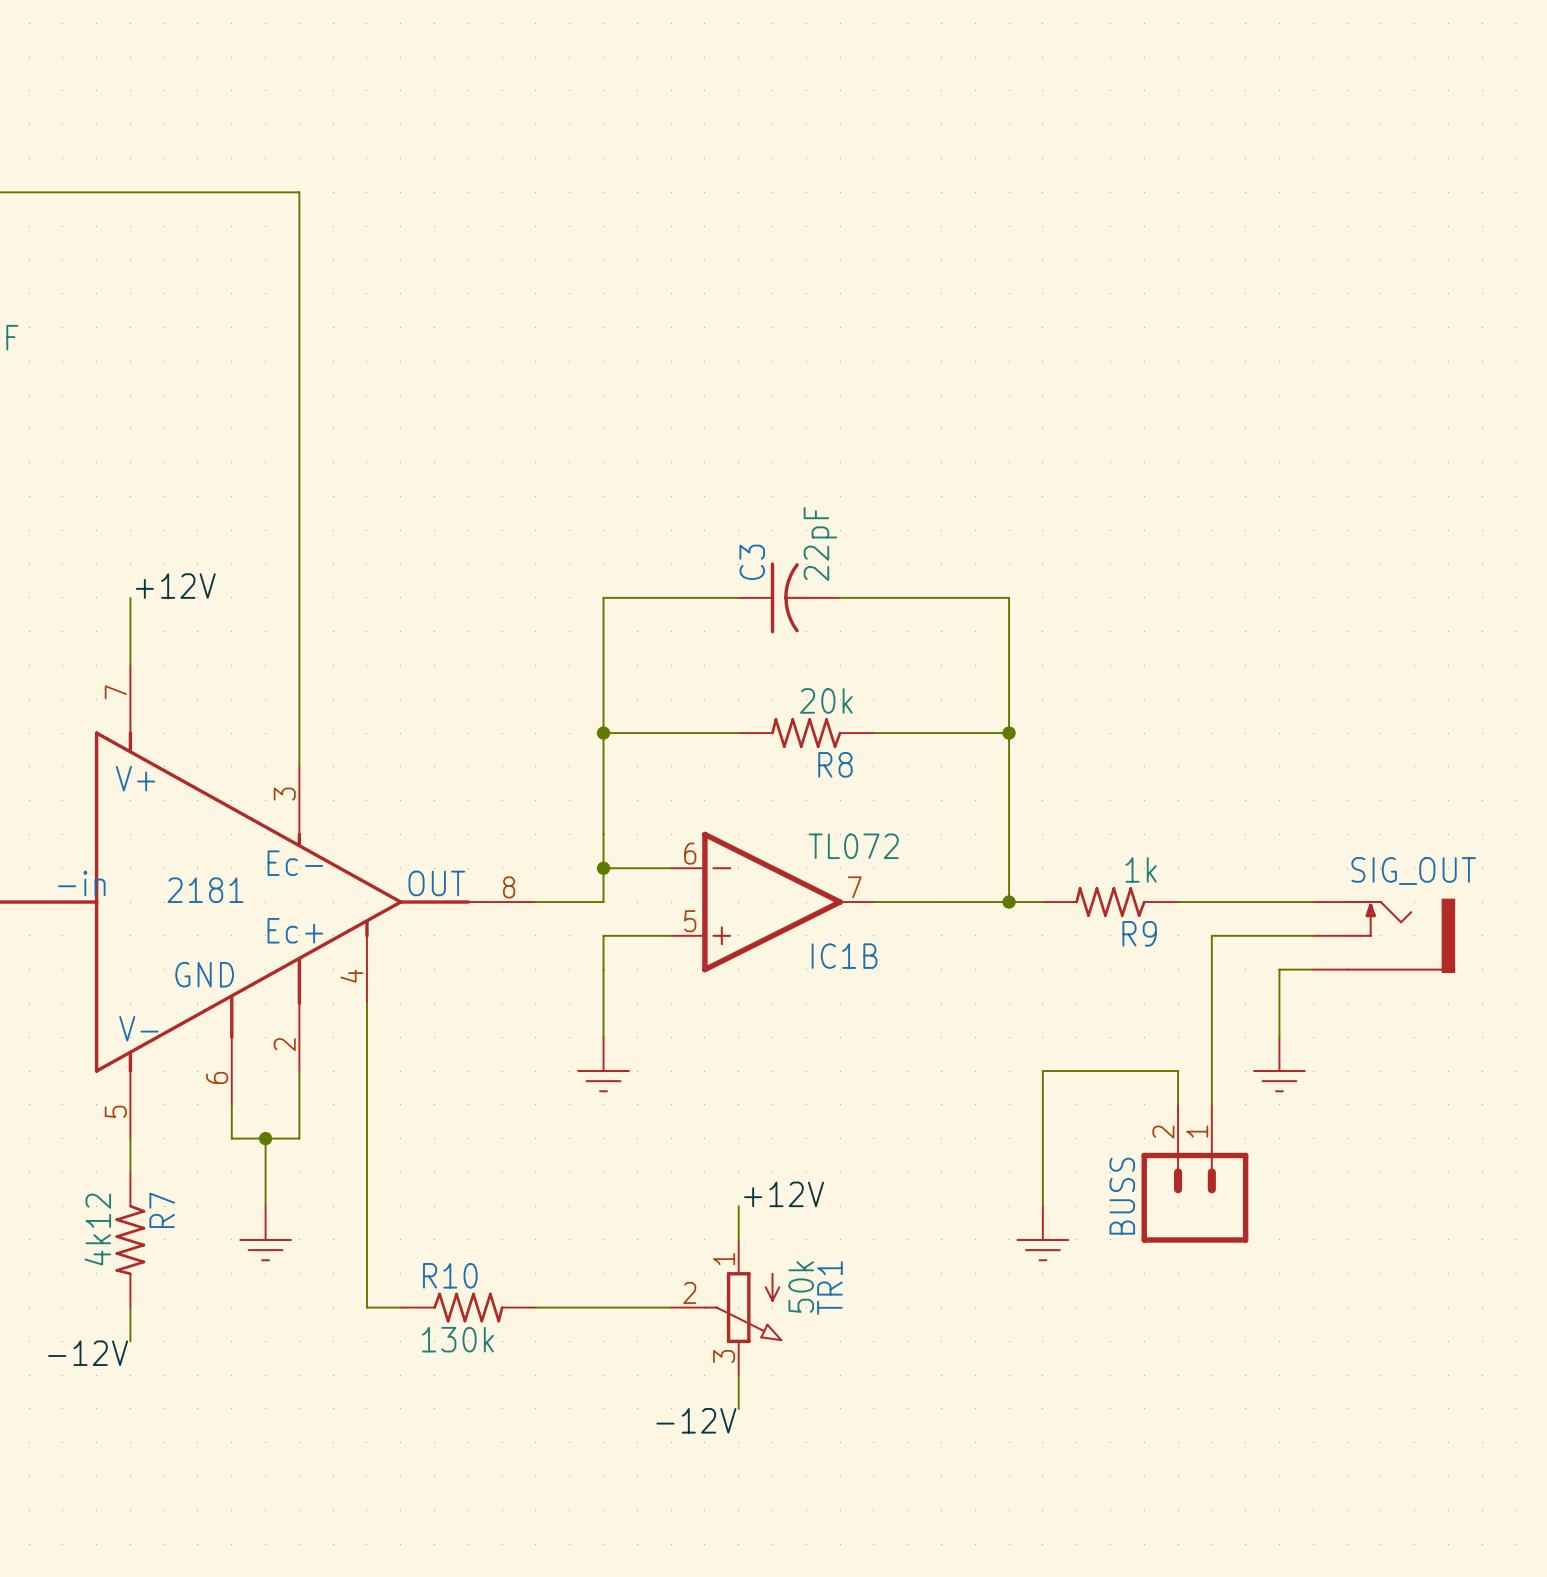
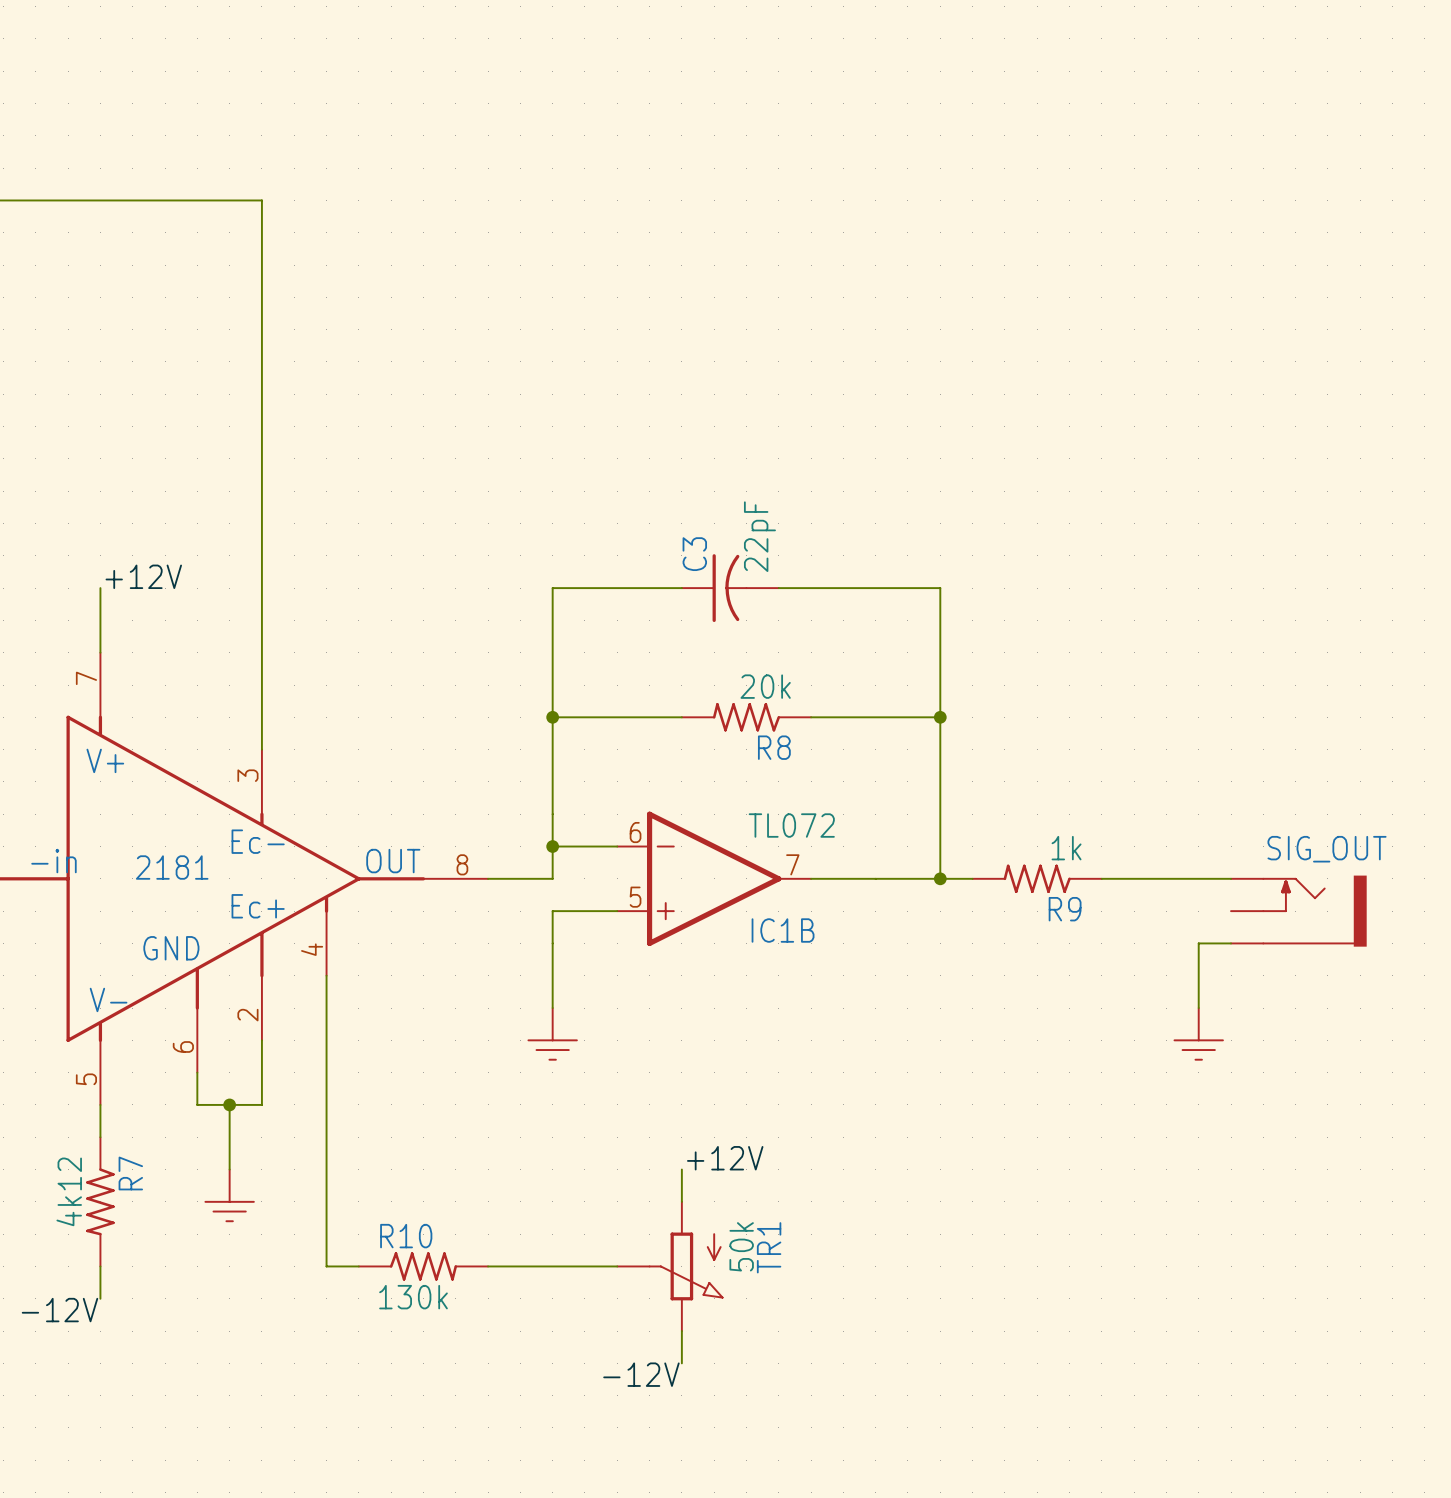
wire: (1313, 935) (1211, 935) (1211, 1104) -> none
wire: (1178, 1104) (1178, 1071) (1042, 1071) (1042, 1206) -> none
BUSS: (1194, 1173) -> none
power symbol: (1042, 1233) -> none
TR1 pin number: 1 (724, 1259) -> none
TR1 pin number: 2 (689, 1292) -> none
TR1 pin number: 3 (724, 1356) -> none

